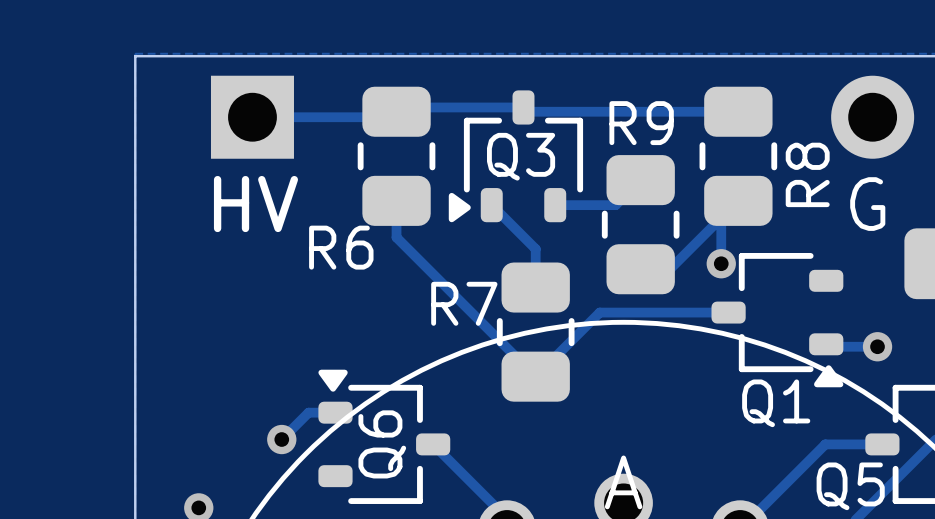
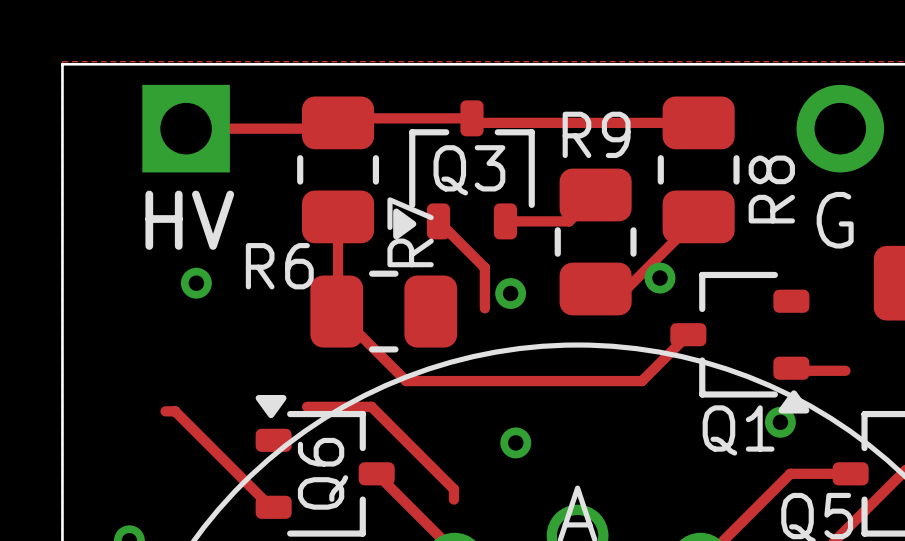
track: (721, 217) (721, 263) -> none
track: (396, 237) (535, 376) (599, 312) (728, 312) -> (338, 255) (336, 311) (406, 381) (641, 381) (688, 334)
via: none -> (196, 283)
via position: (721, 263) -> (660, 278)
via: none -> (510, 293)
R7 rotation: 0° (535, 332) -> 90° clockwise (383, 311)
R7 position: (535, 332) -> (383, 311)
via position: (877, 346) -> (780, 422)
track: none -> (307, 406) (371, 406) (453, 489) (453, 499)
track: none -> (165, 411) (175, 411) (273, 509)
track: (335, 412) (308, 412) (281, 439) -> none
via: none -> (515, 442)
via: (281, 439) -> none

